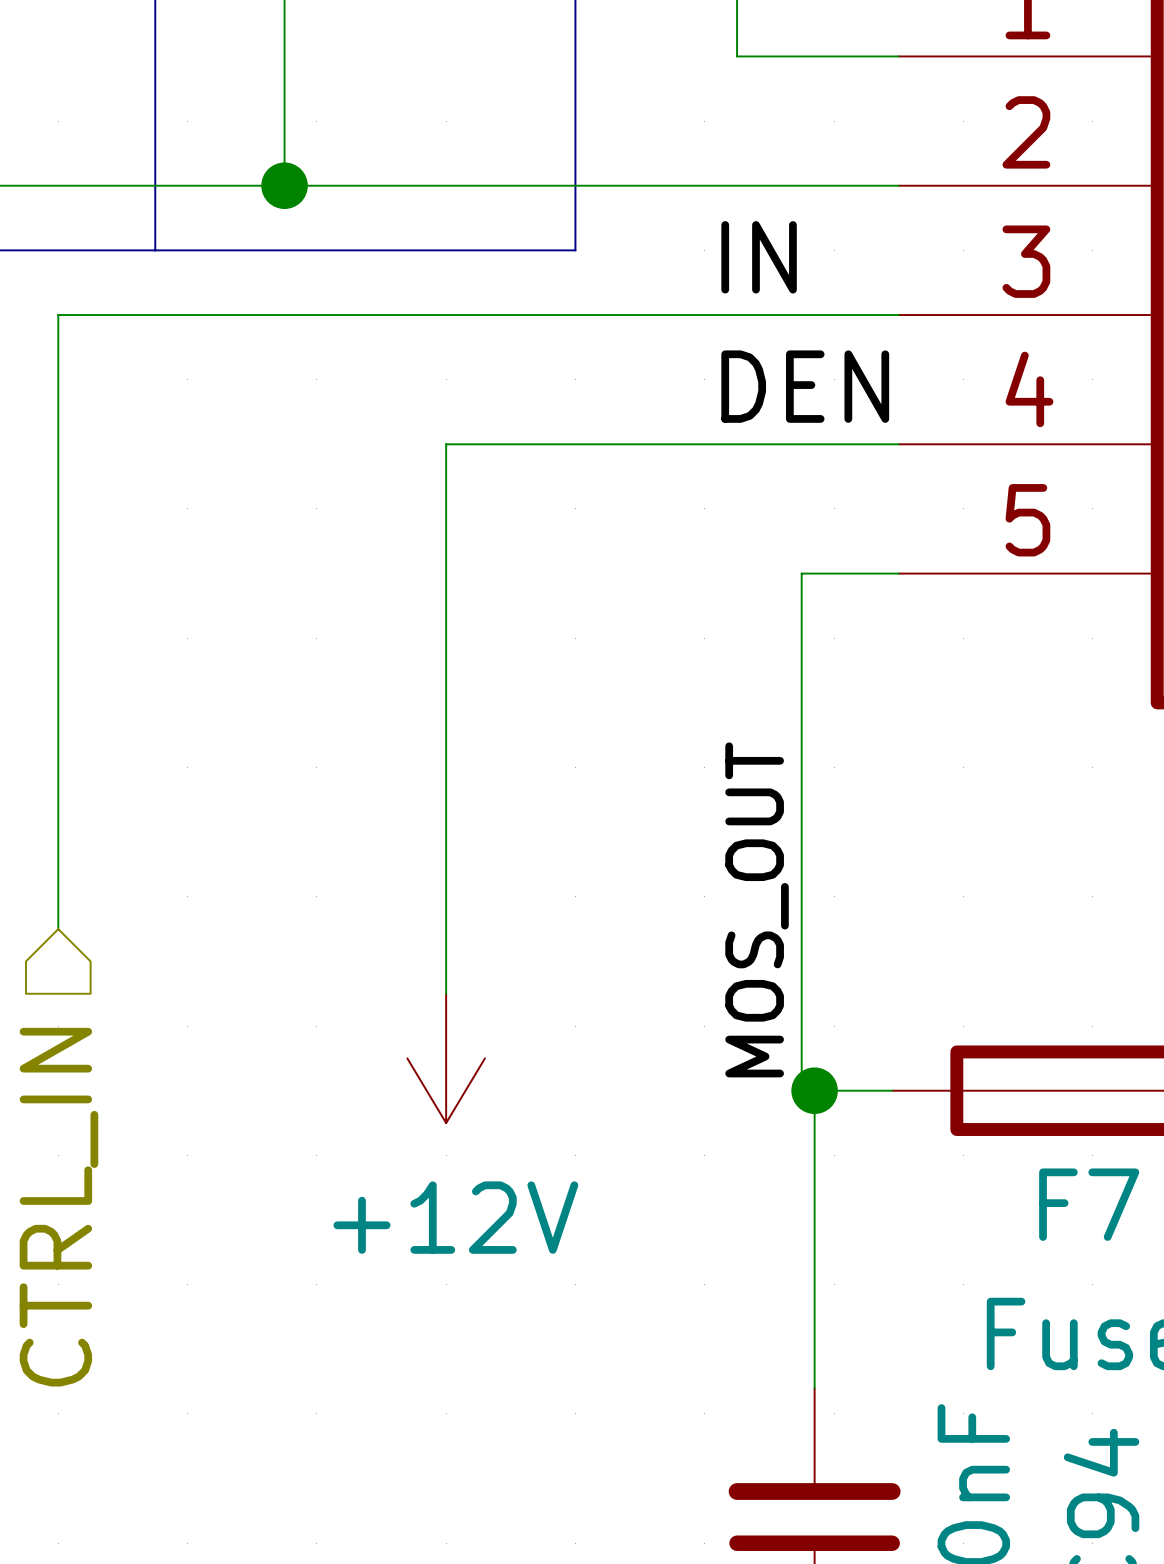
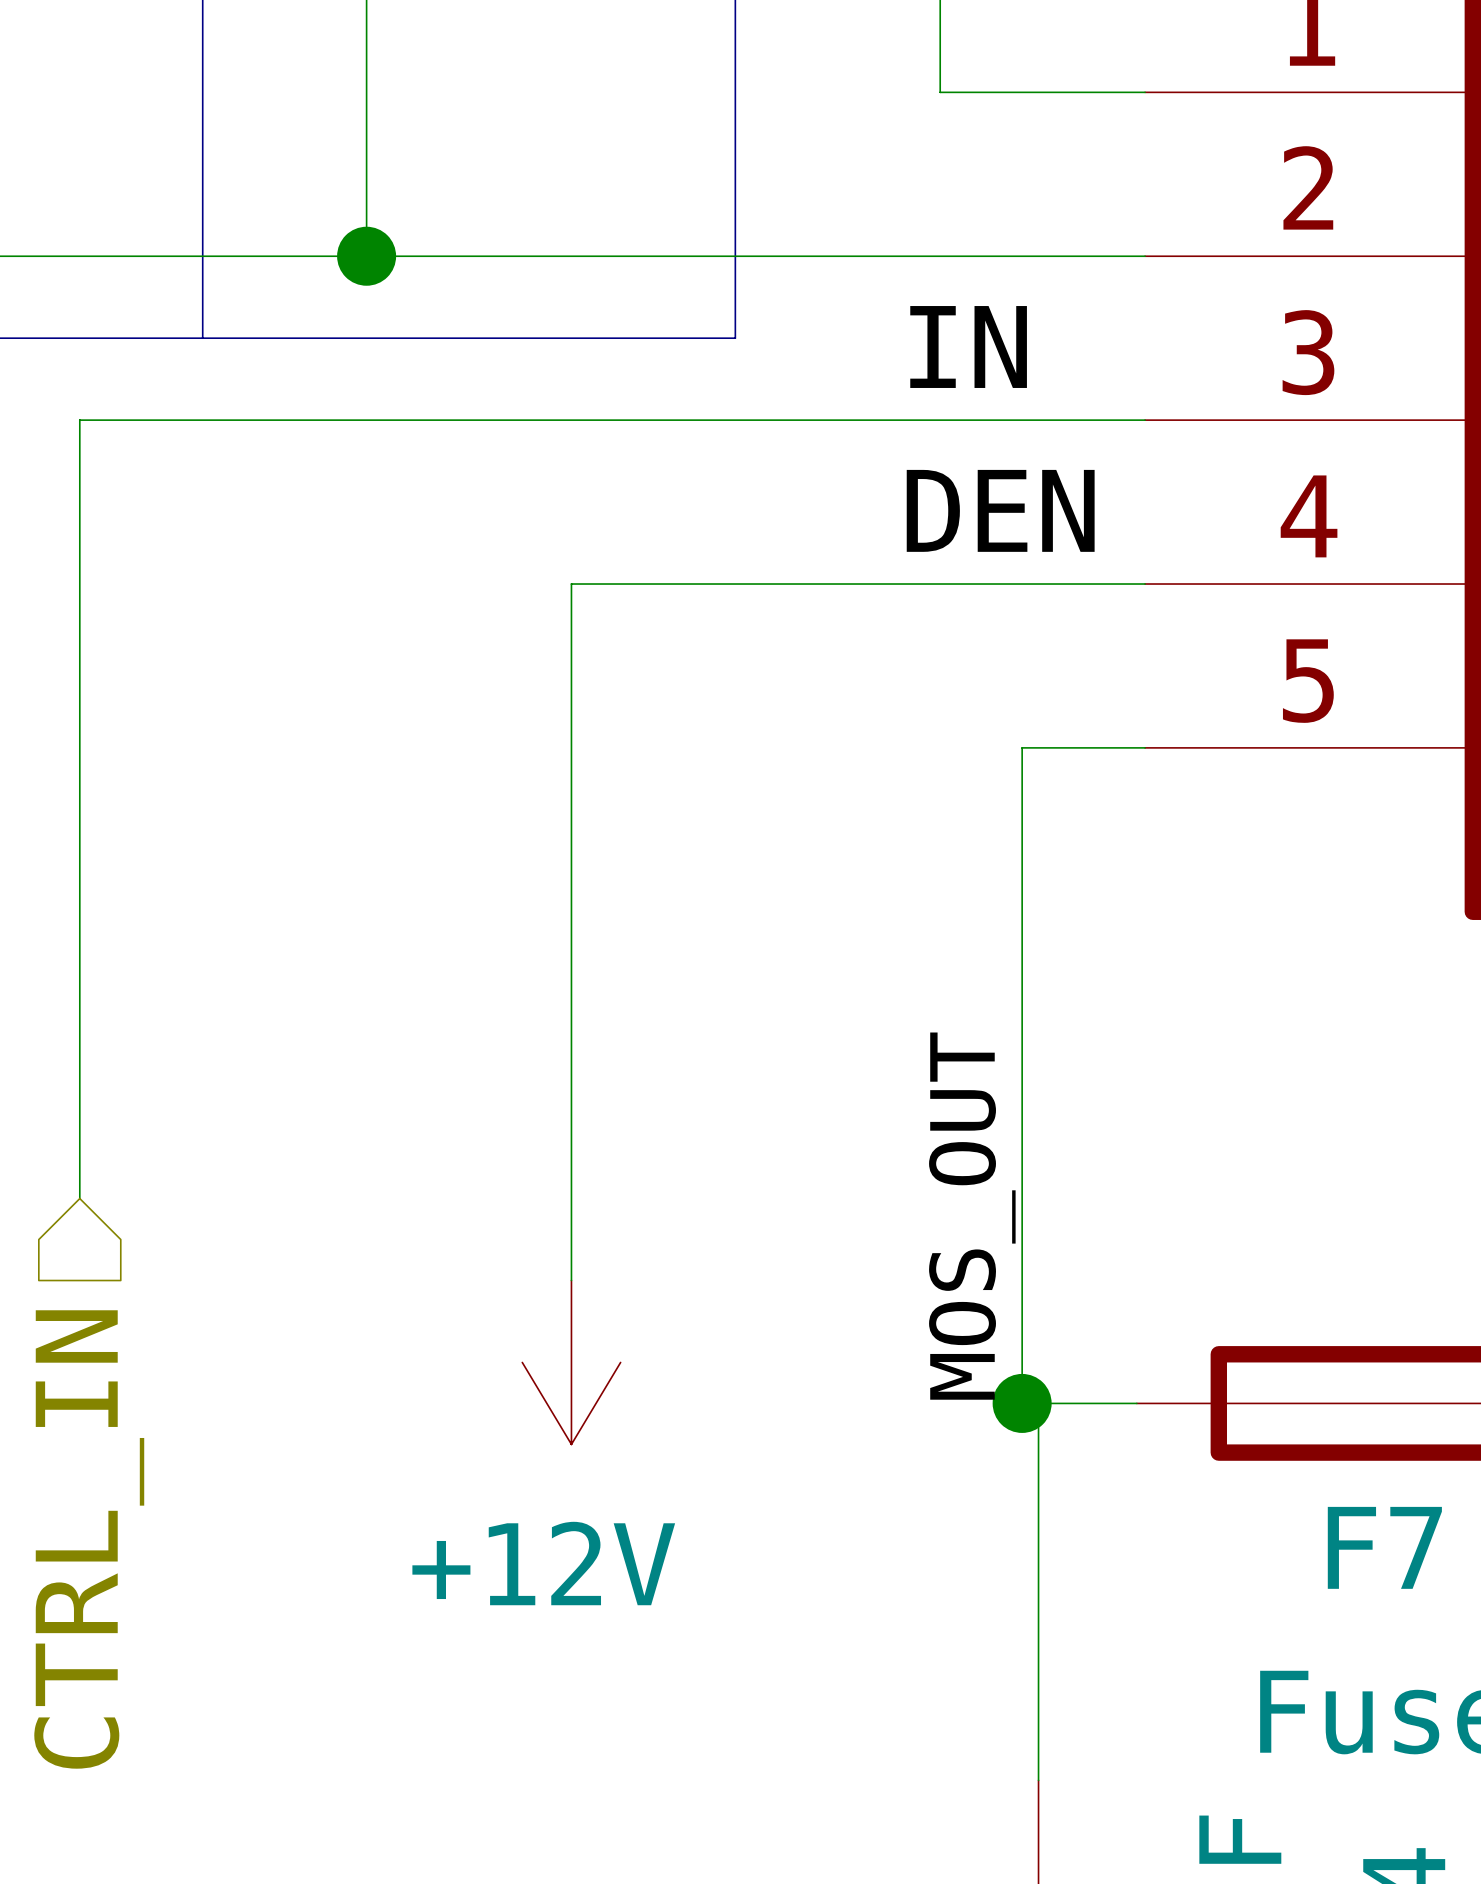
junction position: (814, 1090) -> (1022, 1403)

